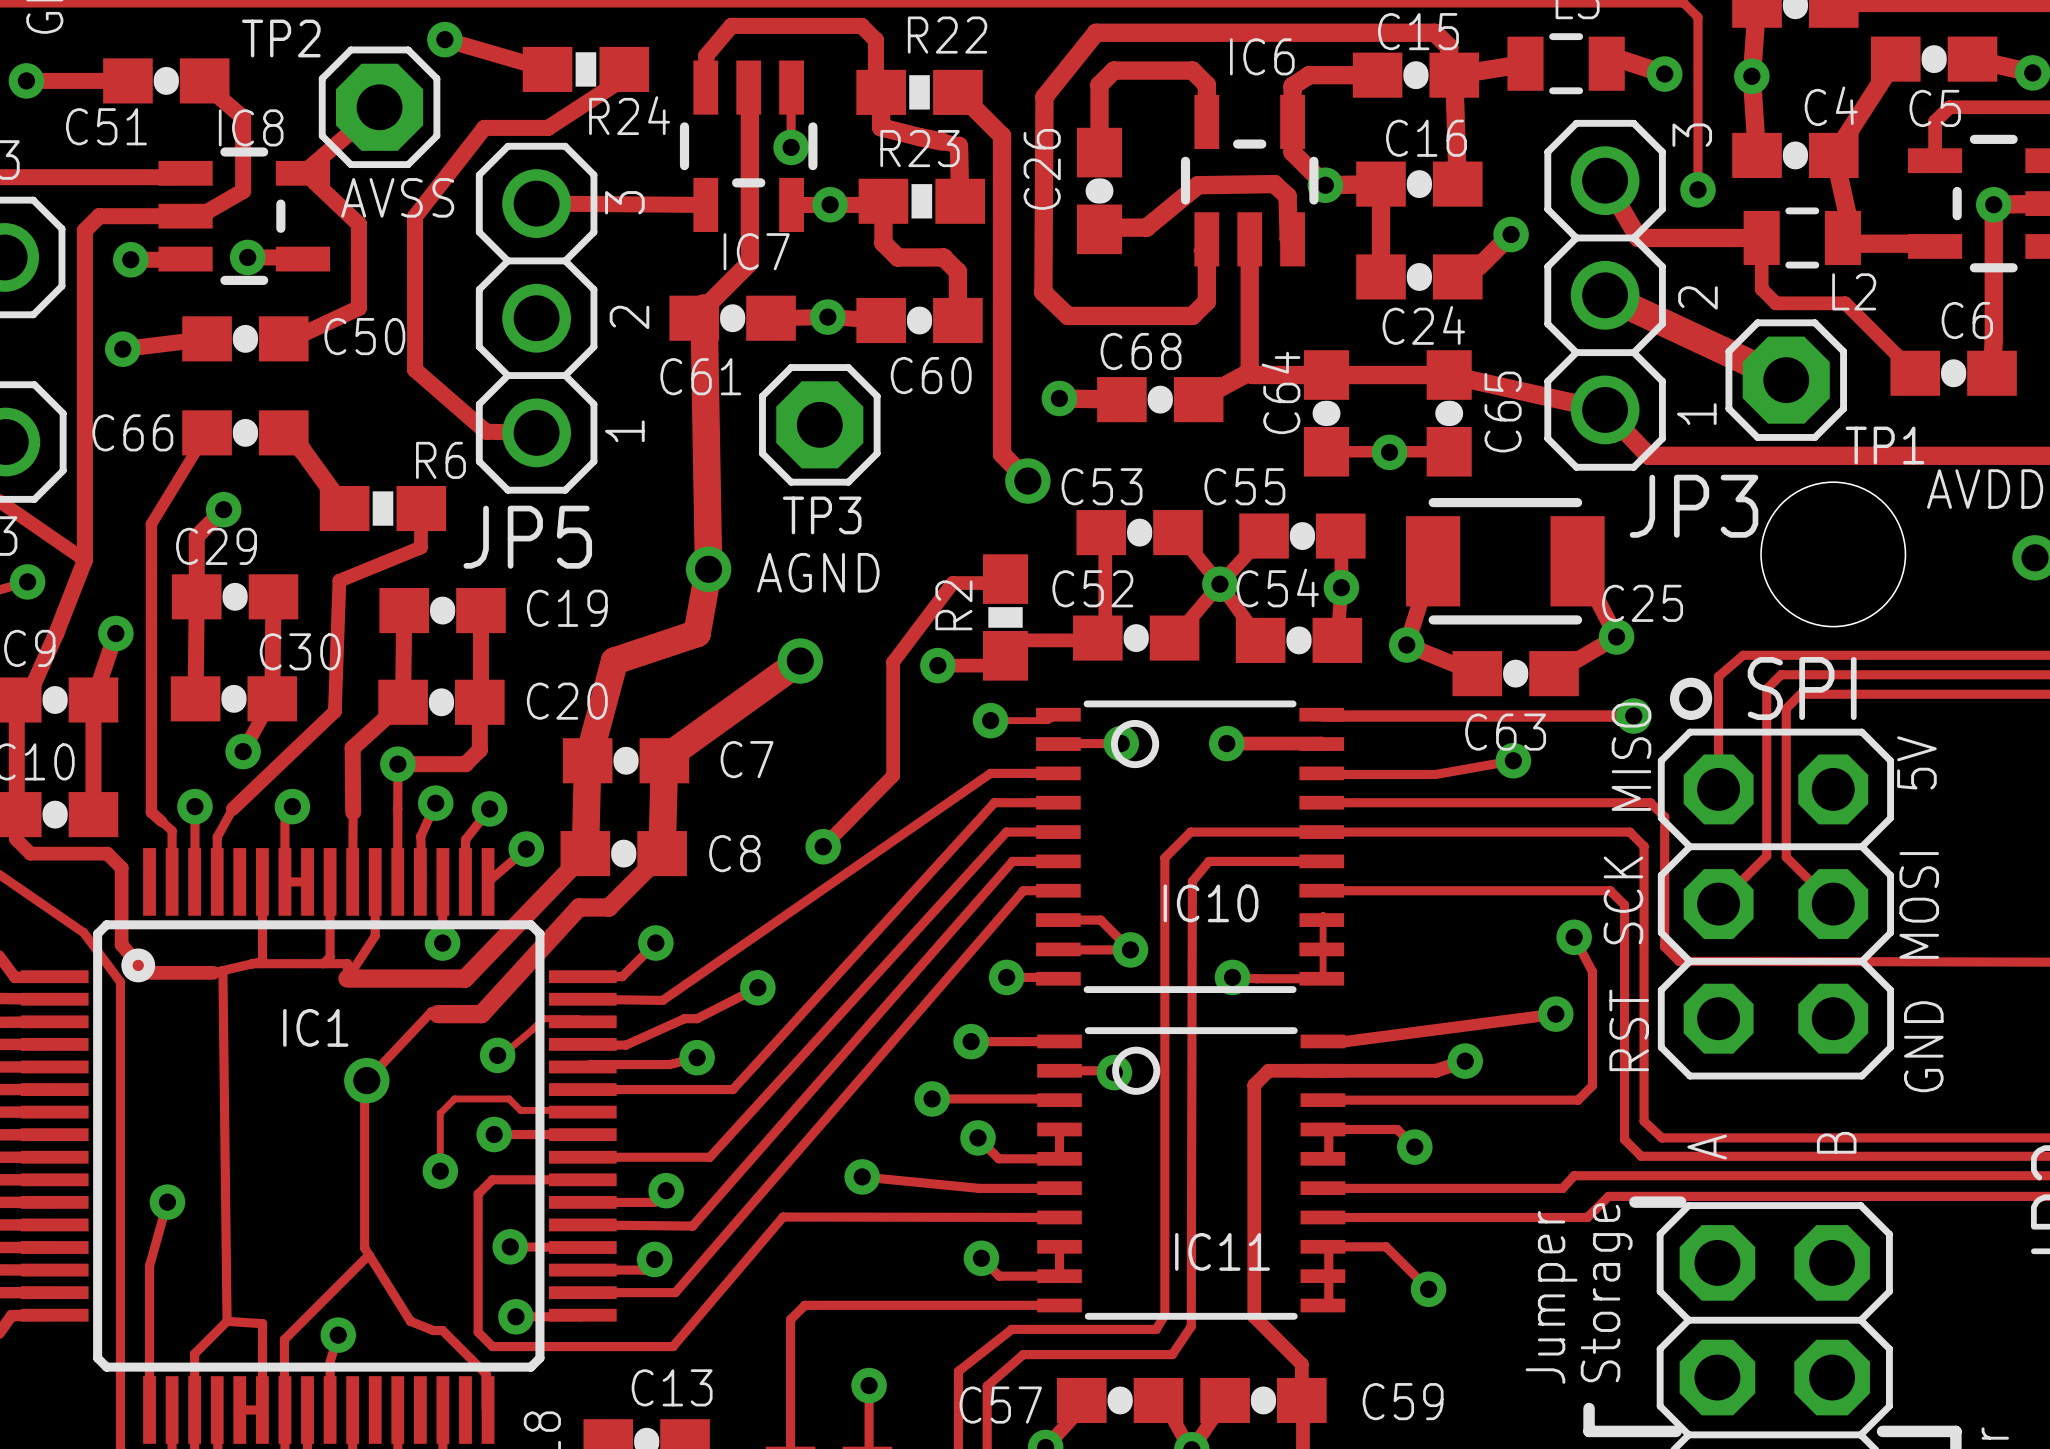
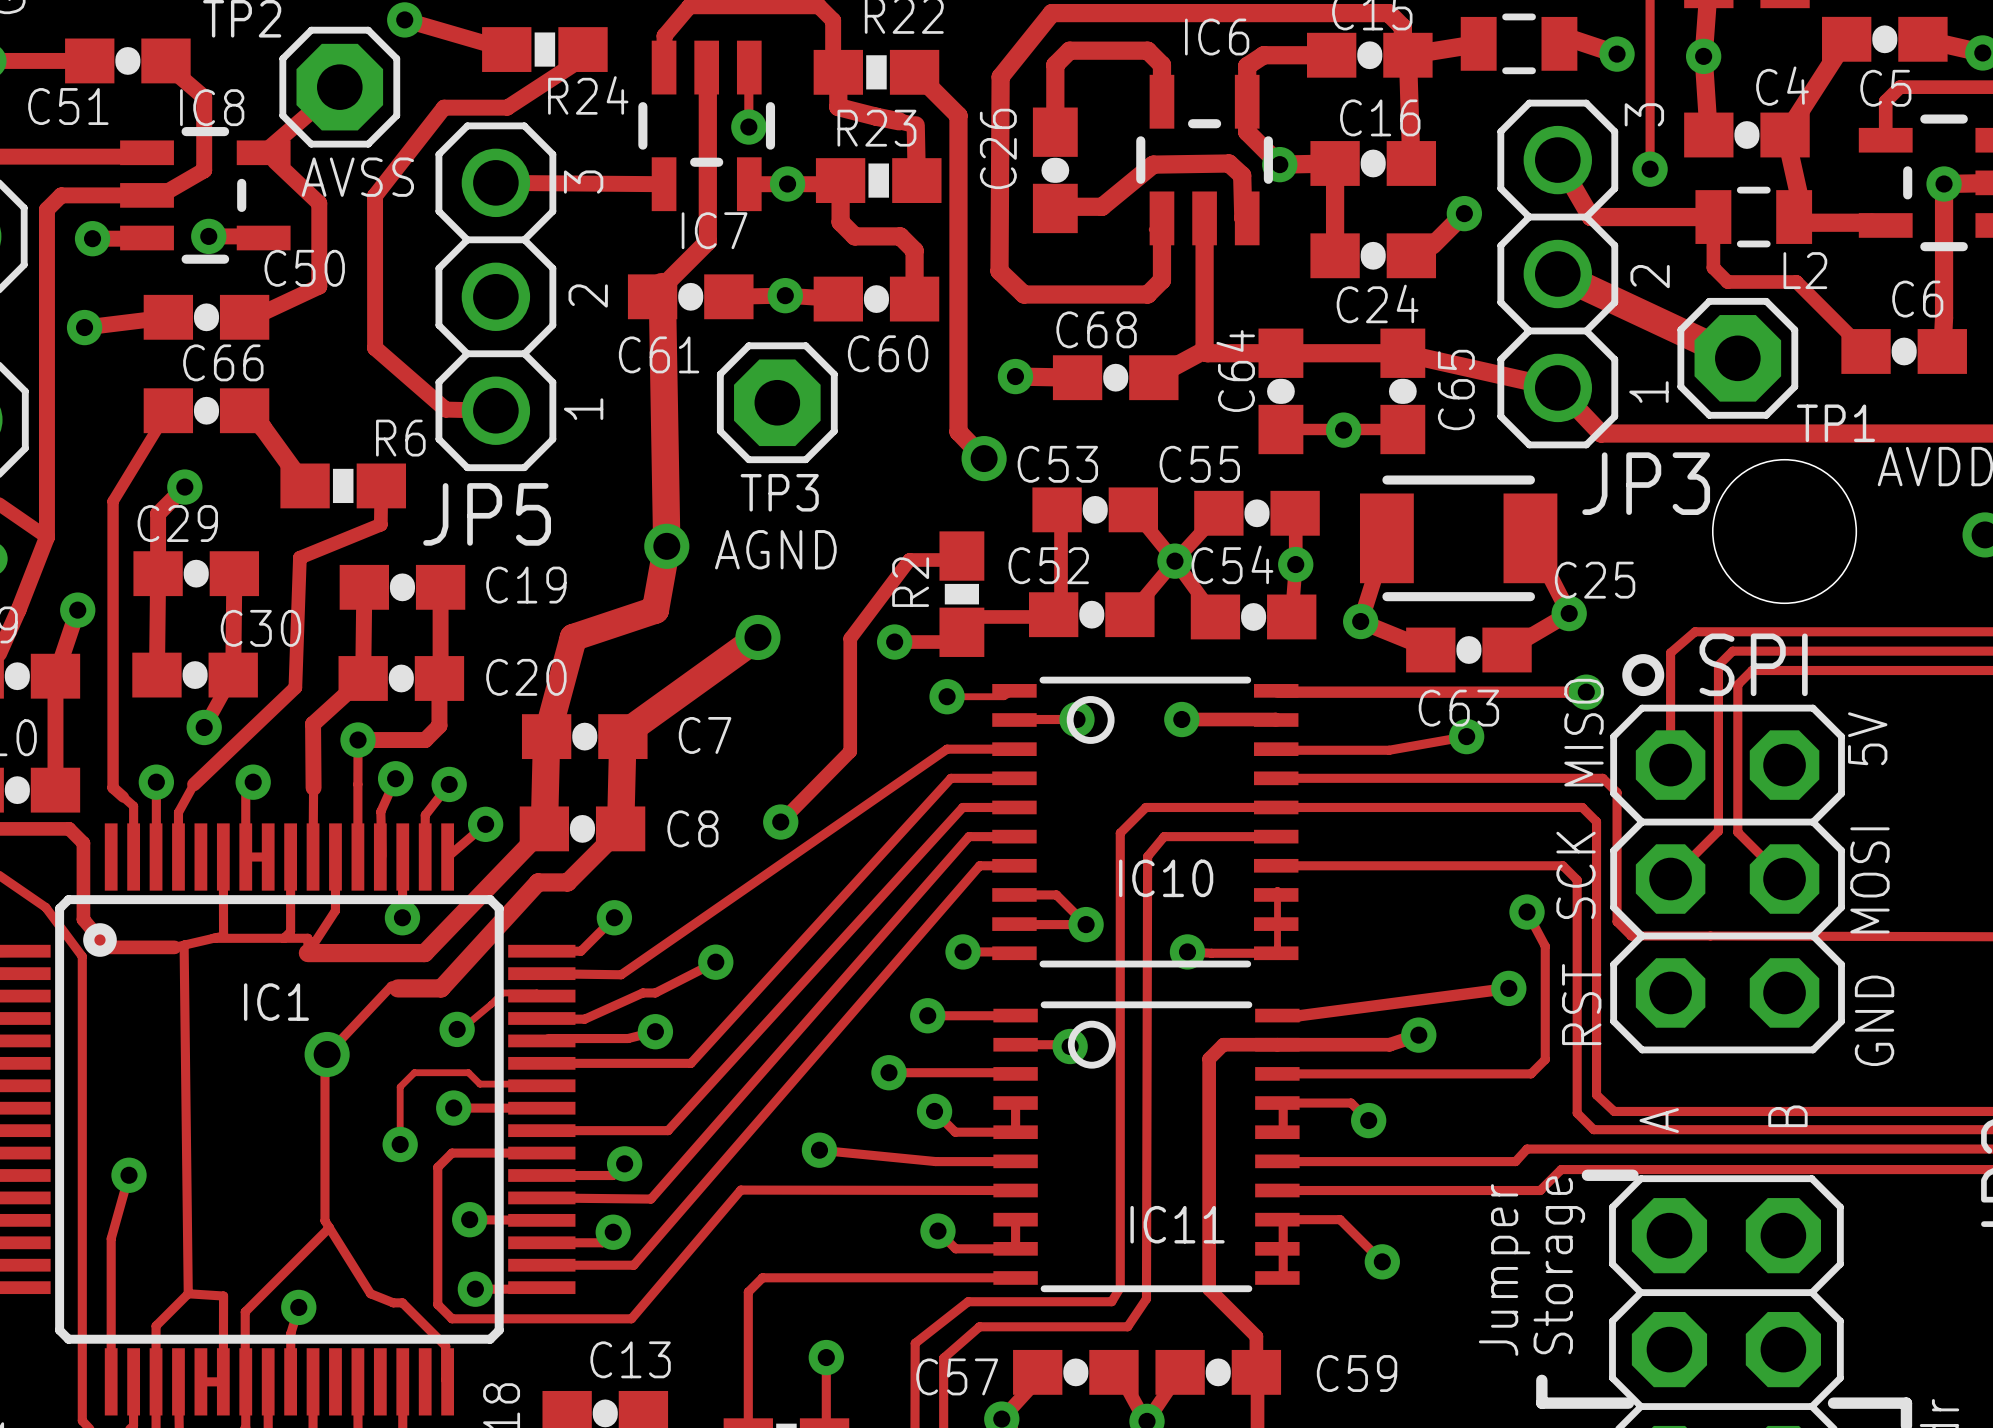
C50 name position: C50 (364, 336) -> C50 (304, 268)
C66 name position: C66 (132, 432) -> C66 (223, 362)

